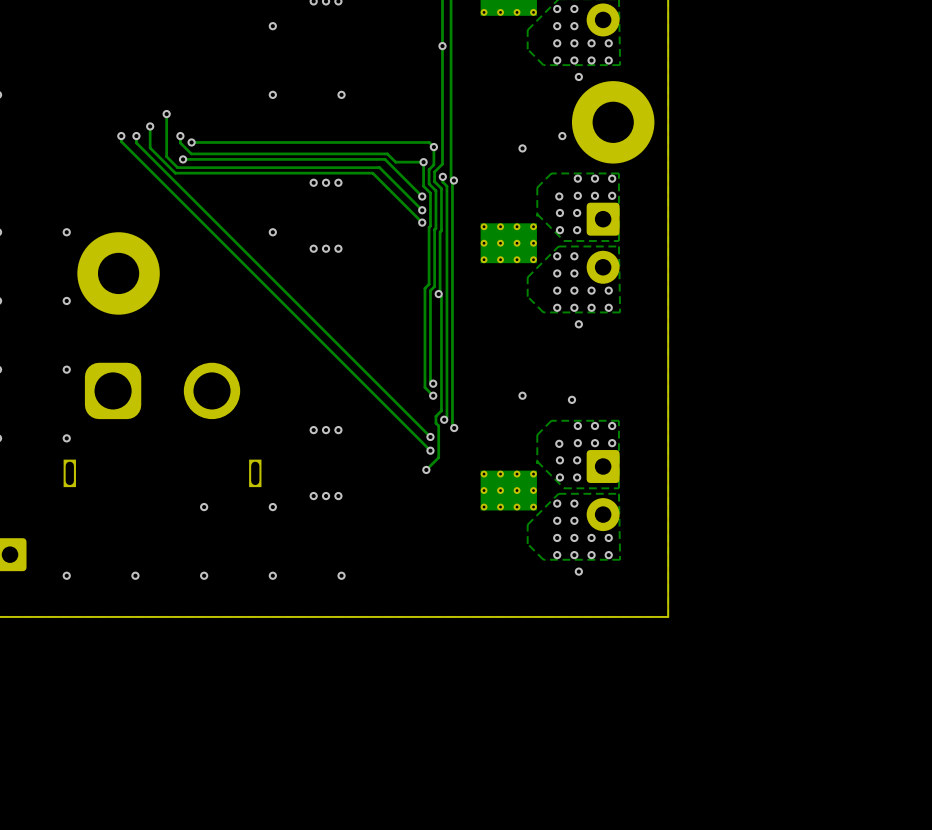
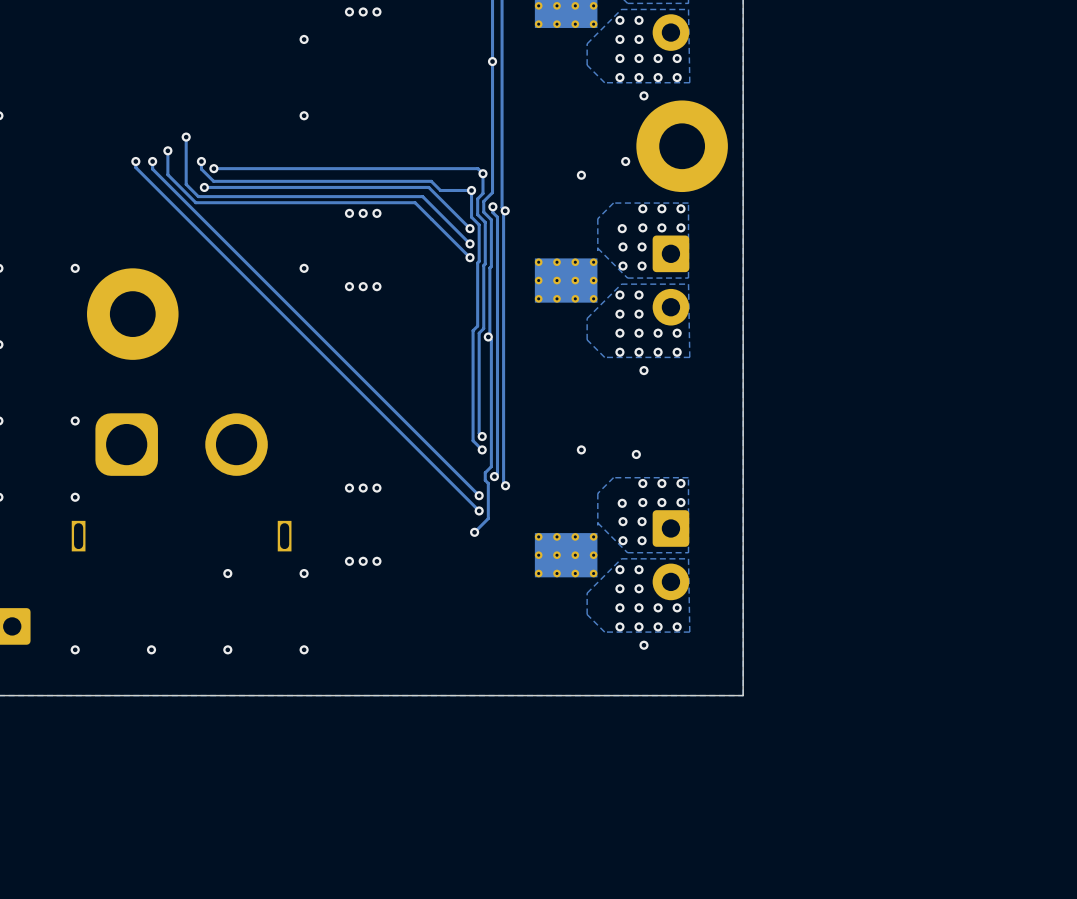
via: (341, 94) -> none
via: (66, 300) -> none
via: (341, 575) -> none

